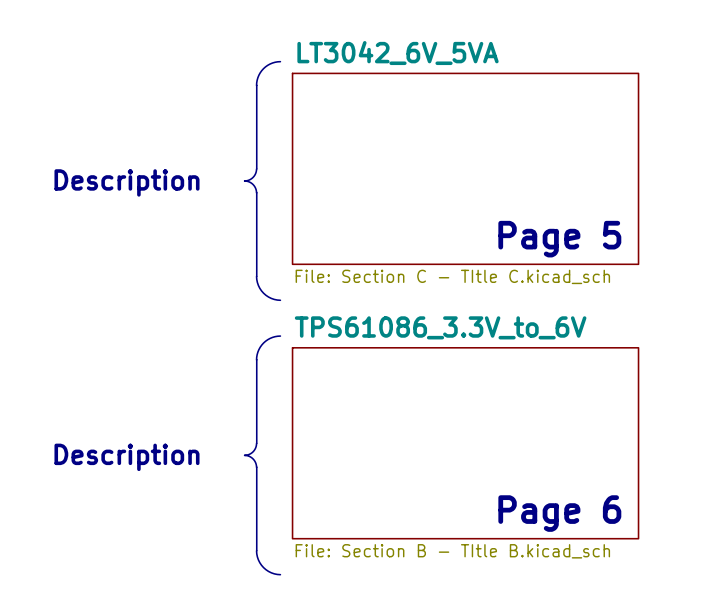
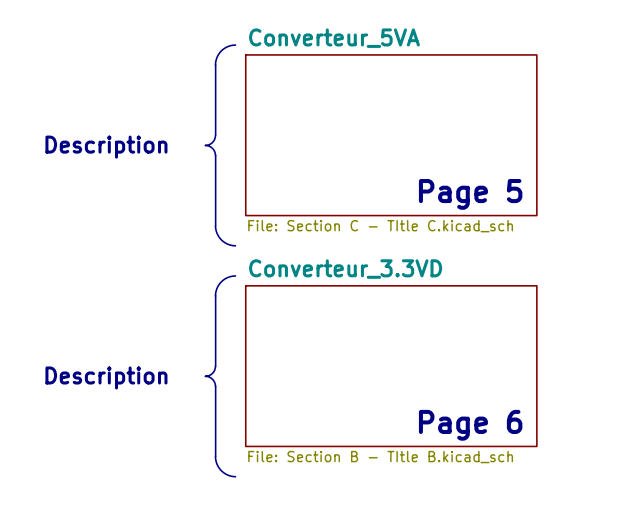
sheet LT3042_6V_5VA name: LT3042_6V_5VA (398, 53) -> Converteur_5VA (334, 38)
sheet TPS61086_3.3V_to_6V name: TPS61086_3.3V_to_6V (440, 327) -> Converteur_3.3VD (345, 269)

